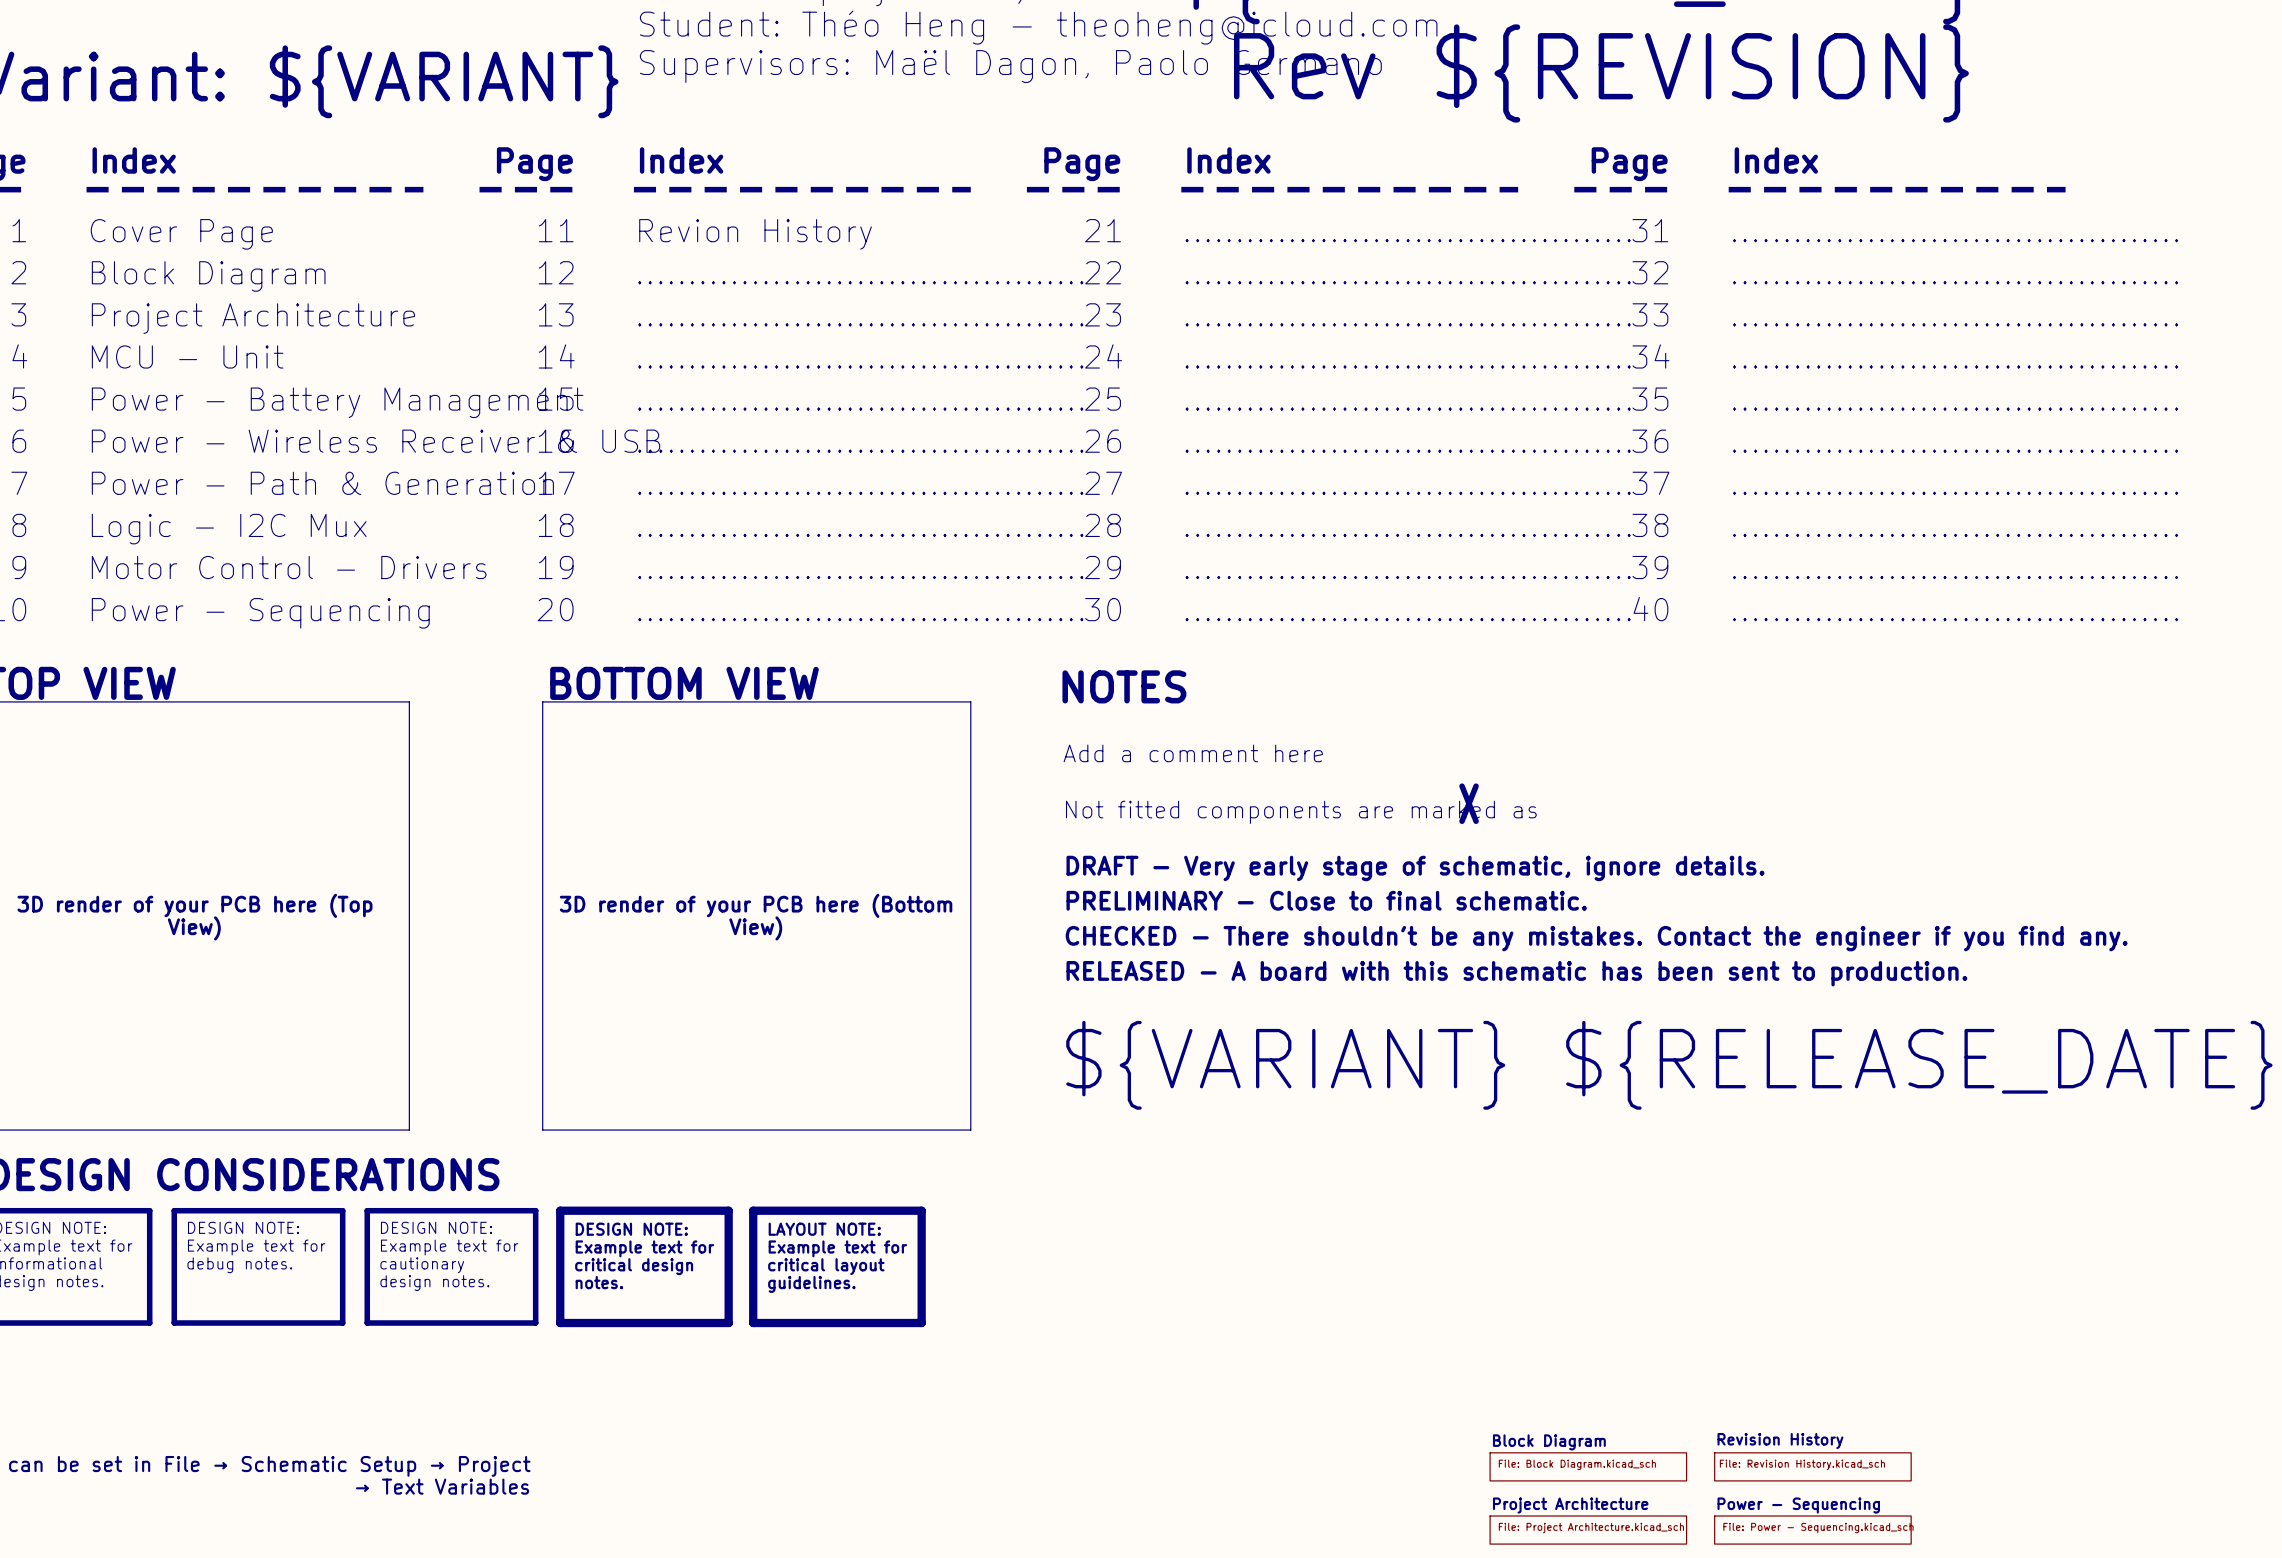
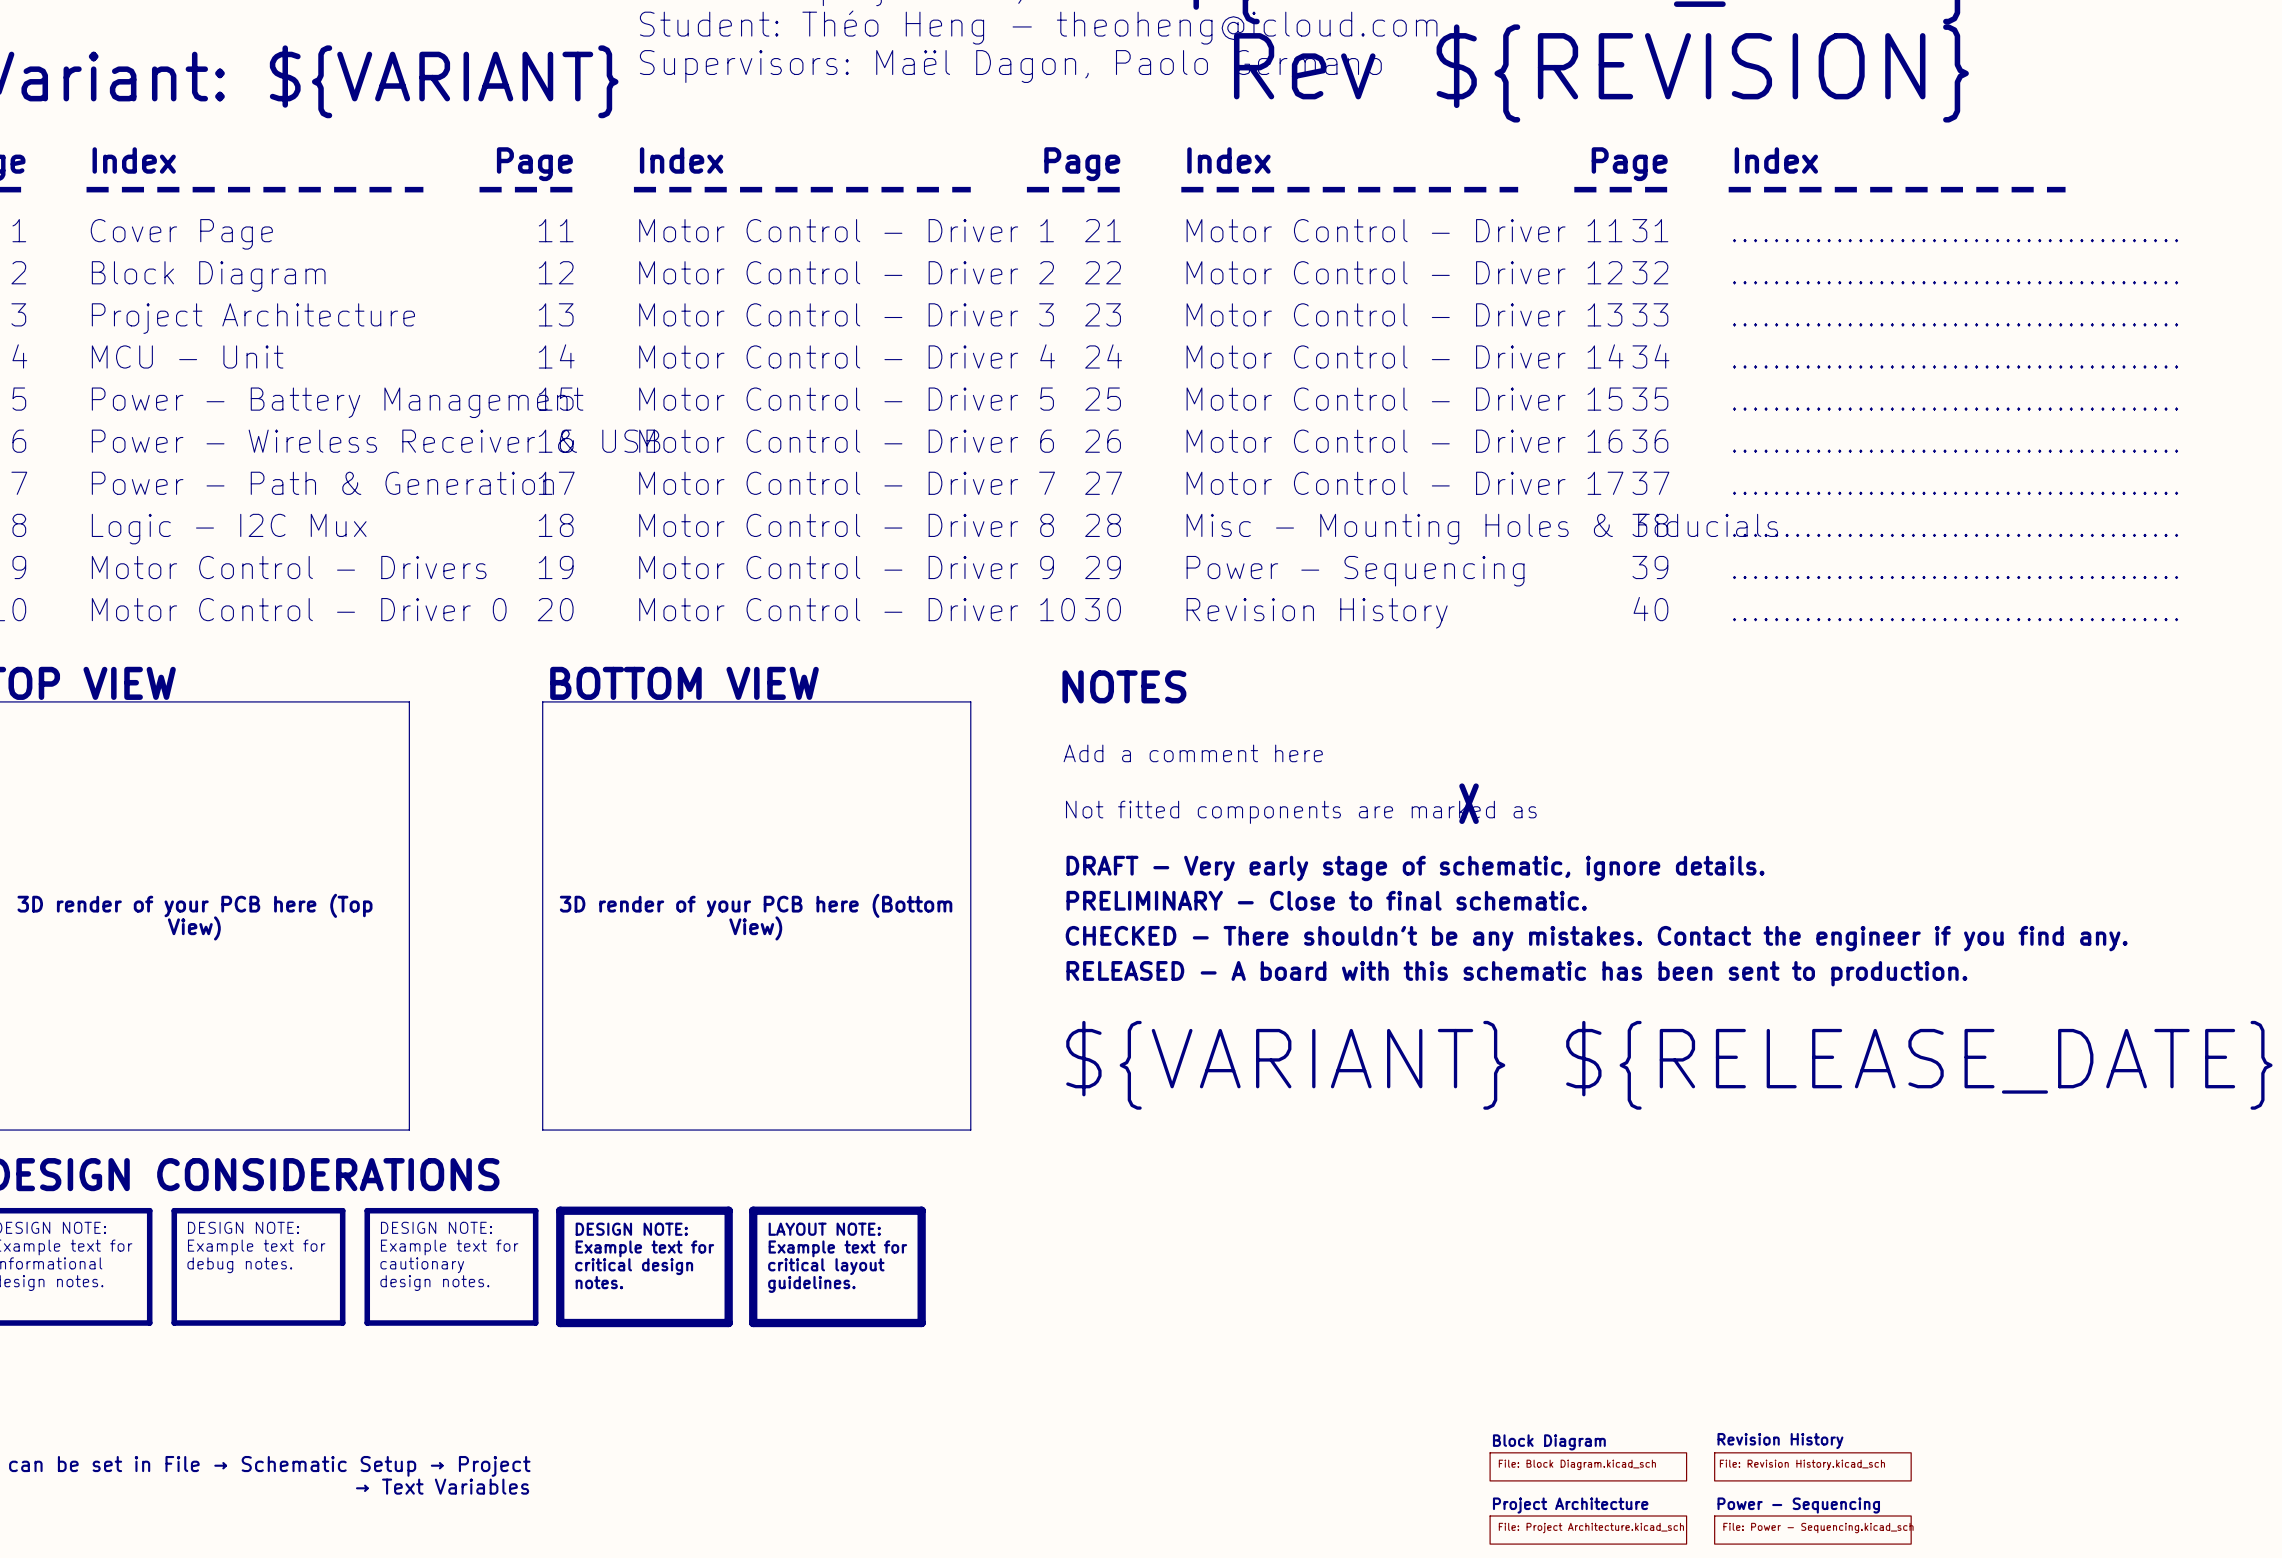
text: Revion History (755, 234) -> Motor Control - Driver 1 (846, 230)
text: ........................................... (1408, 240) -> Motor Control - Driver 11 (1404, 230)
text: ........................................... (860, 282) -> Motor Control - Driver 2 (846, 272)
text: ........................................... (1408, 282) -> Motor Control - Driver 12 (1404, 272)
text: ........................................... (860, 324) -> Motor Control - Driver 3 (846, 314)
text: ........................................... (1408, 324) -> Motor Control - Driver 13 (1404, 314)
text: ........................................... (860, 366) -> Motor Control - Driver 4 (847, 356)
text: ........................................... (1408, 366) -> Motor Control - Driver 14 (1405, 356)
text: ........................................... (860, 409) -> Motor Control - Driver 5 (846, 399)
text: ........................................... (1408, 409) -> Motor Control - Driver 15 (1404, 399)
text: ........................................... (860, 451) -> Motor Control - Driver 6 (846, 441)
text: ........................................... (1408, 451) -> Motor Control - Driver 16 (1404, 441)
text: ........................................... (860, 493) -> Motor Control - Driver 7 (847, 483)
text: ........................................... (1408, 493) -> Motor Control - Driver 17 (1405, 483)
text: ........................................... (860, 535) -> Motor Control - Driver 8 (846, 525)
text: ........................................... (1408, 535) -> Misc - Mounting Holes & Fiducials (1482, 529)
text: ........................................... (860, 577) -> Motor Control - Driver 9 (846, 567)
text: ........................................... (1408, 577) -> Power - Sequencing (1355, 571)
text: Power - Sequencing (260, 613) -> Motor Control - Driver 0 (299, 609)
text: ........................................... (860, 619) -> Motor Control - Driver 10 (857, 609)
text: ........................................... (1408, 619) -> Revision History (1317, 613)

